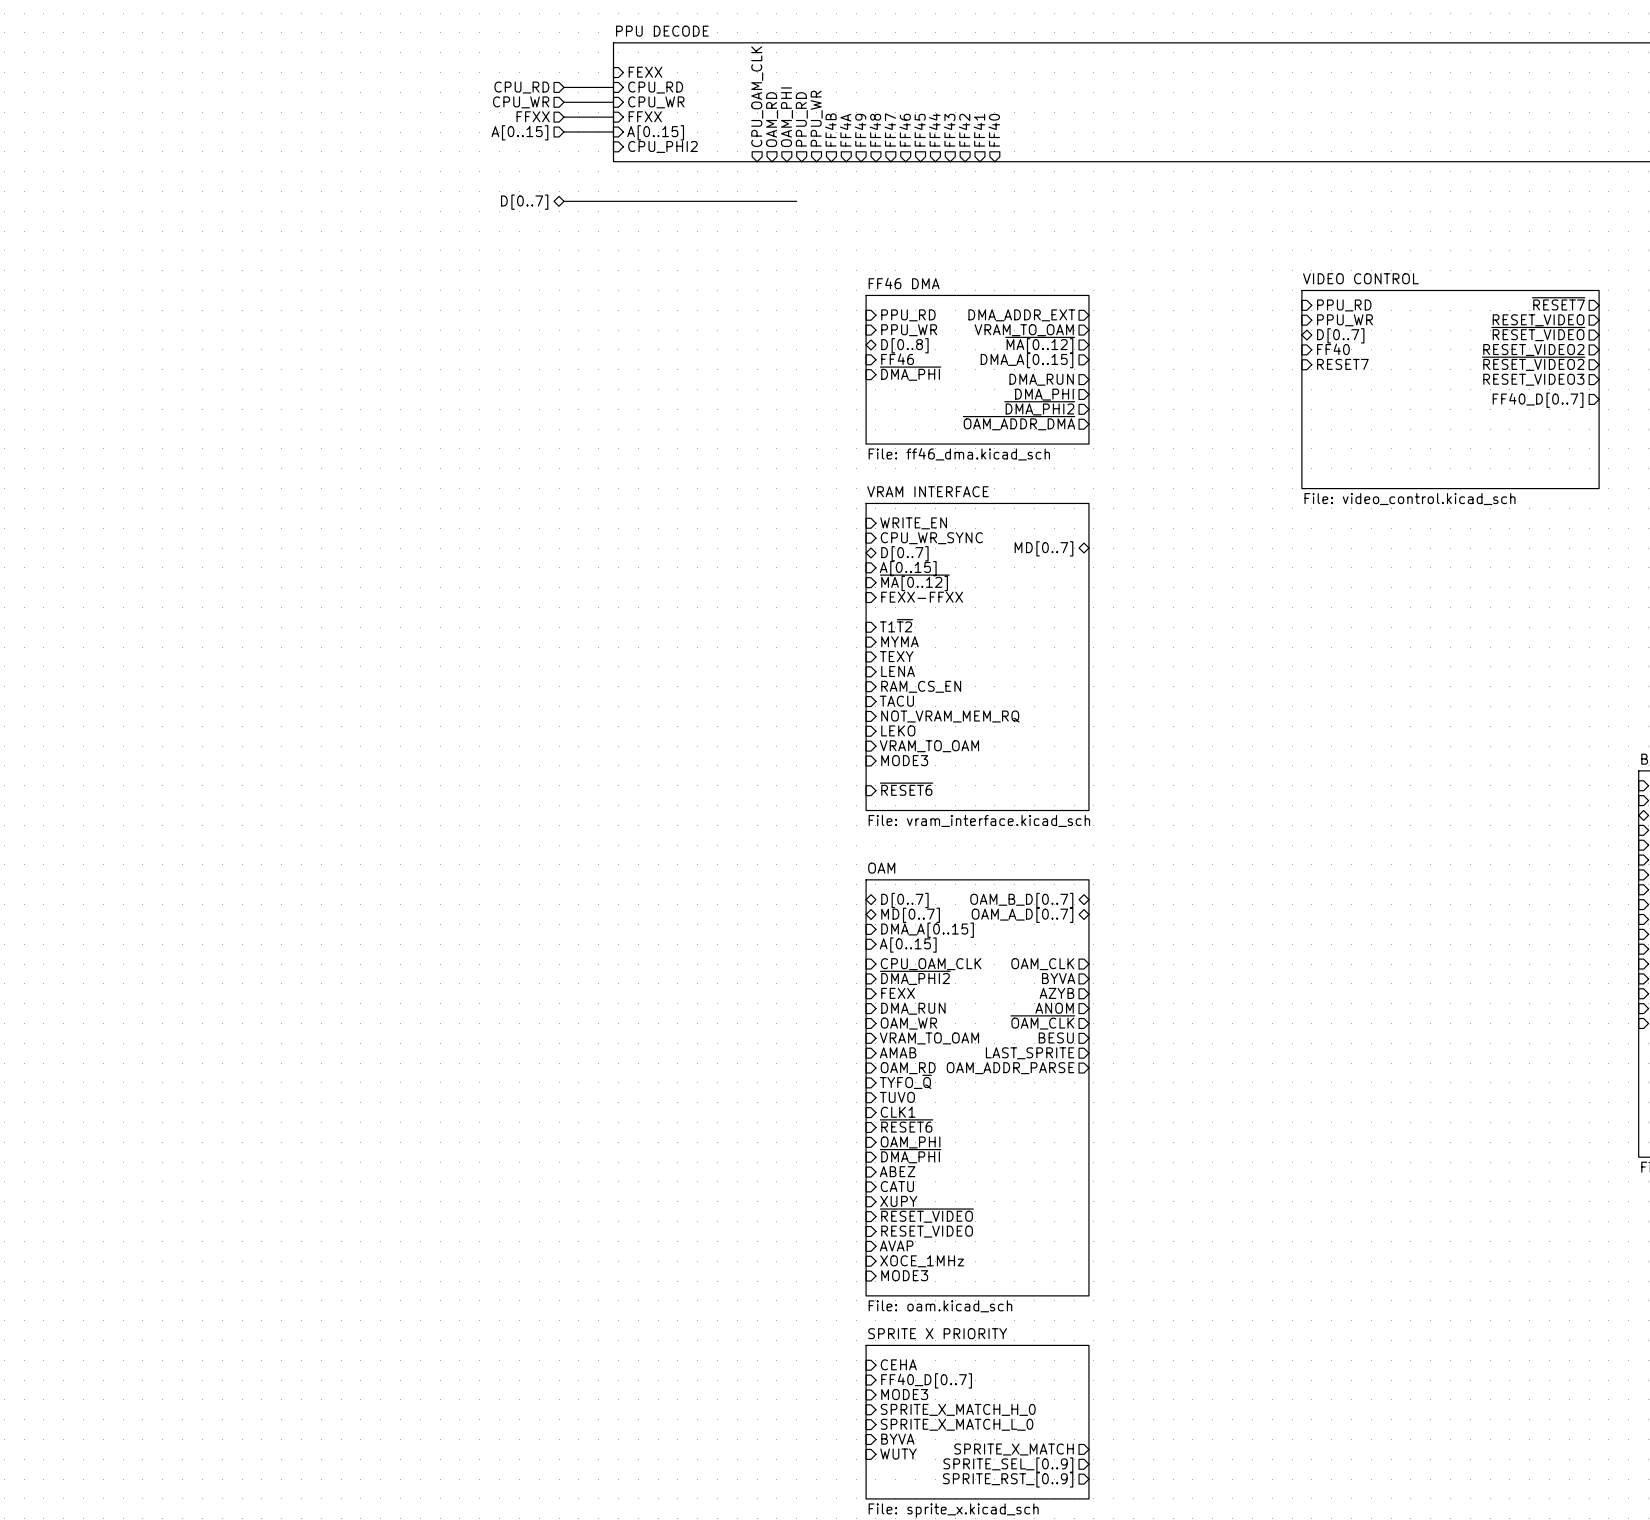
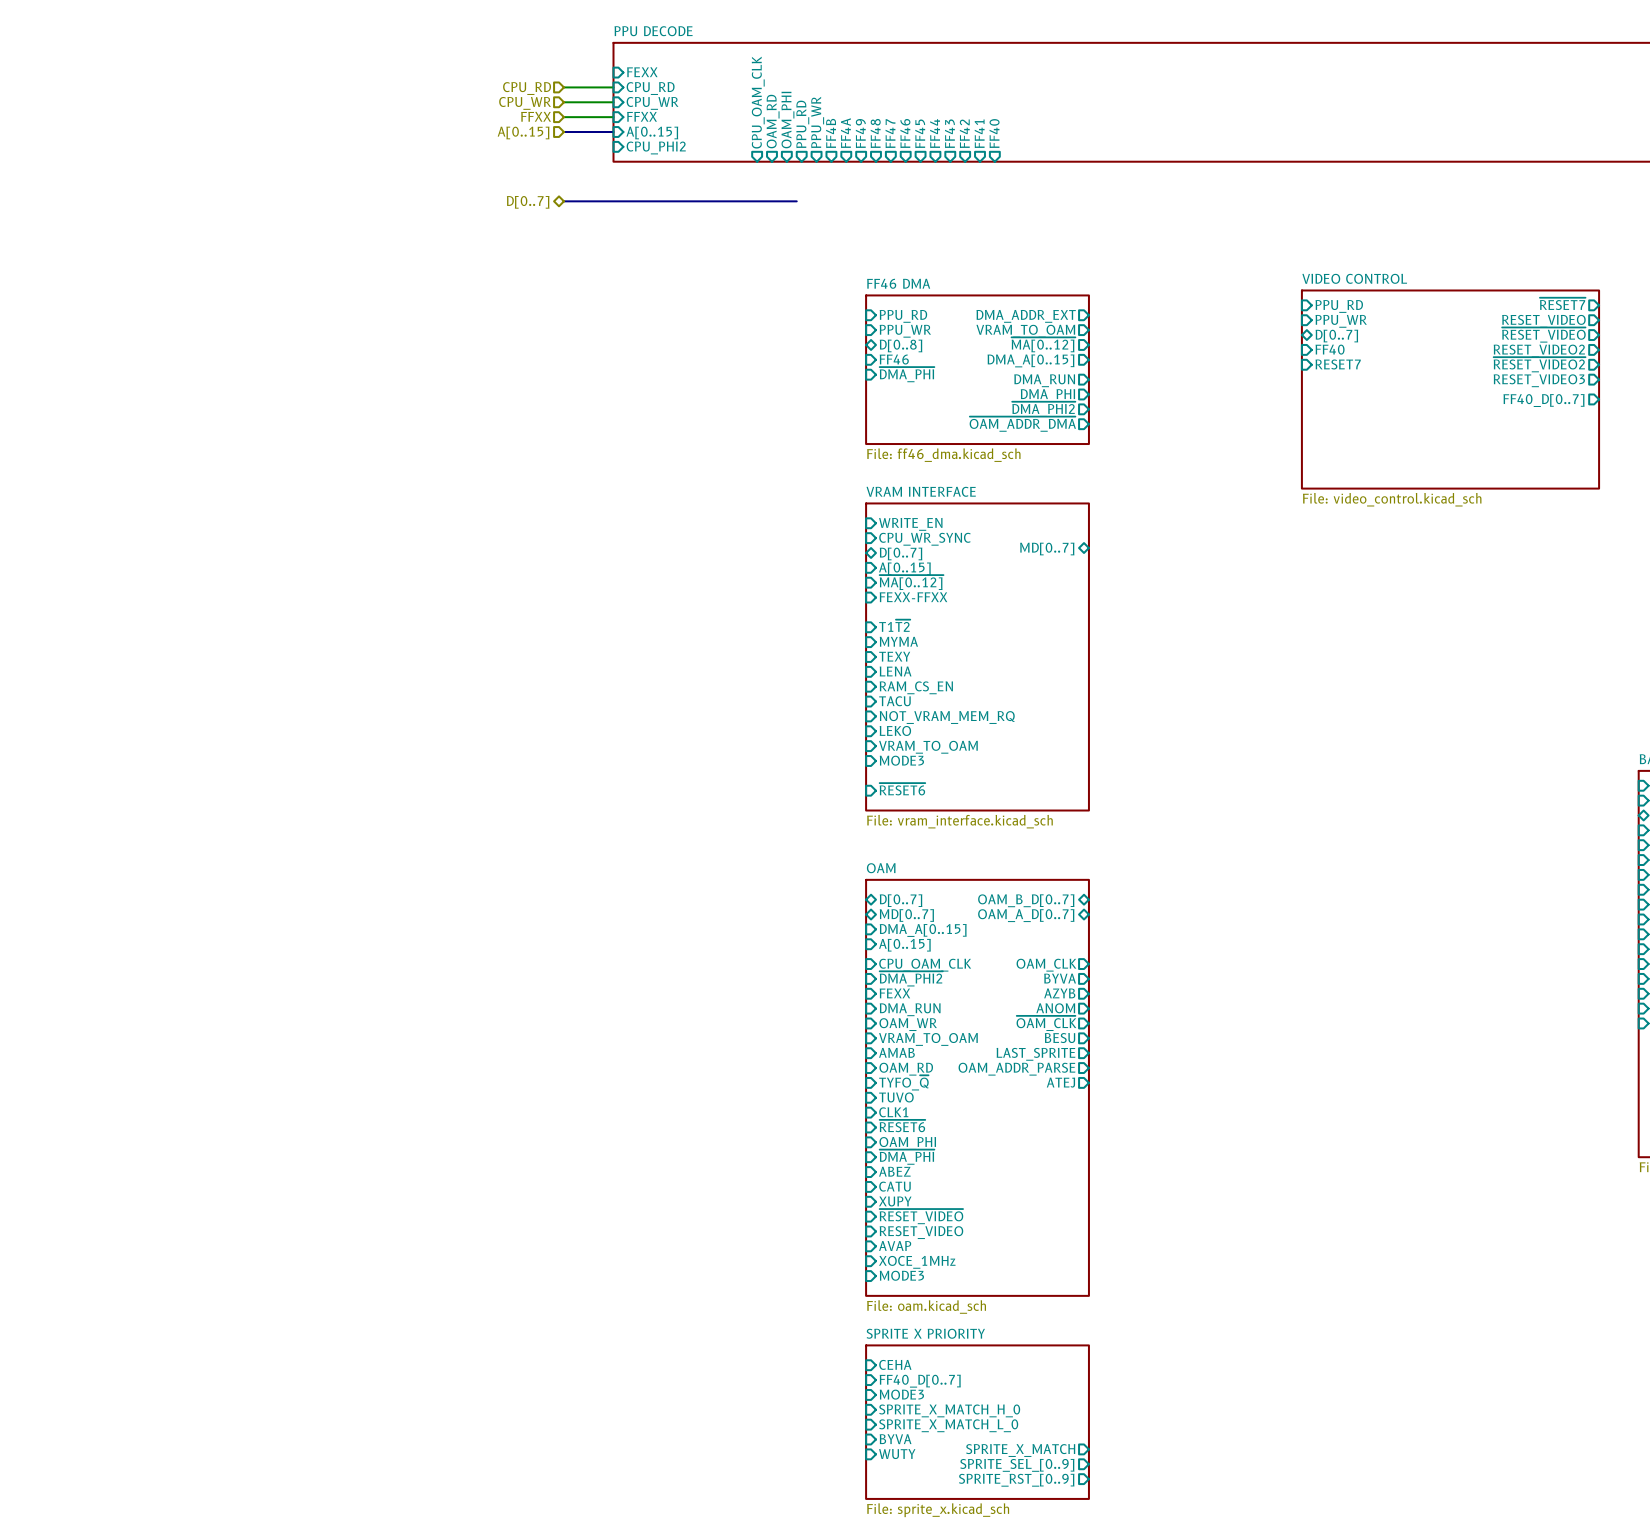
sheet pin: none -> ATEJ (1060, 1082)

